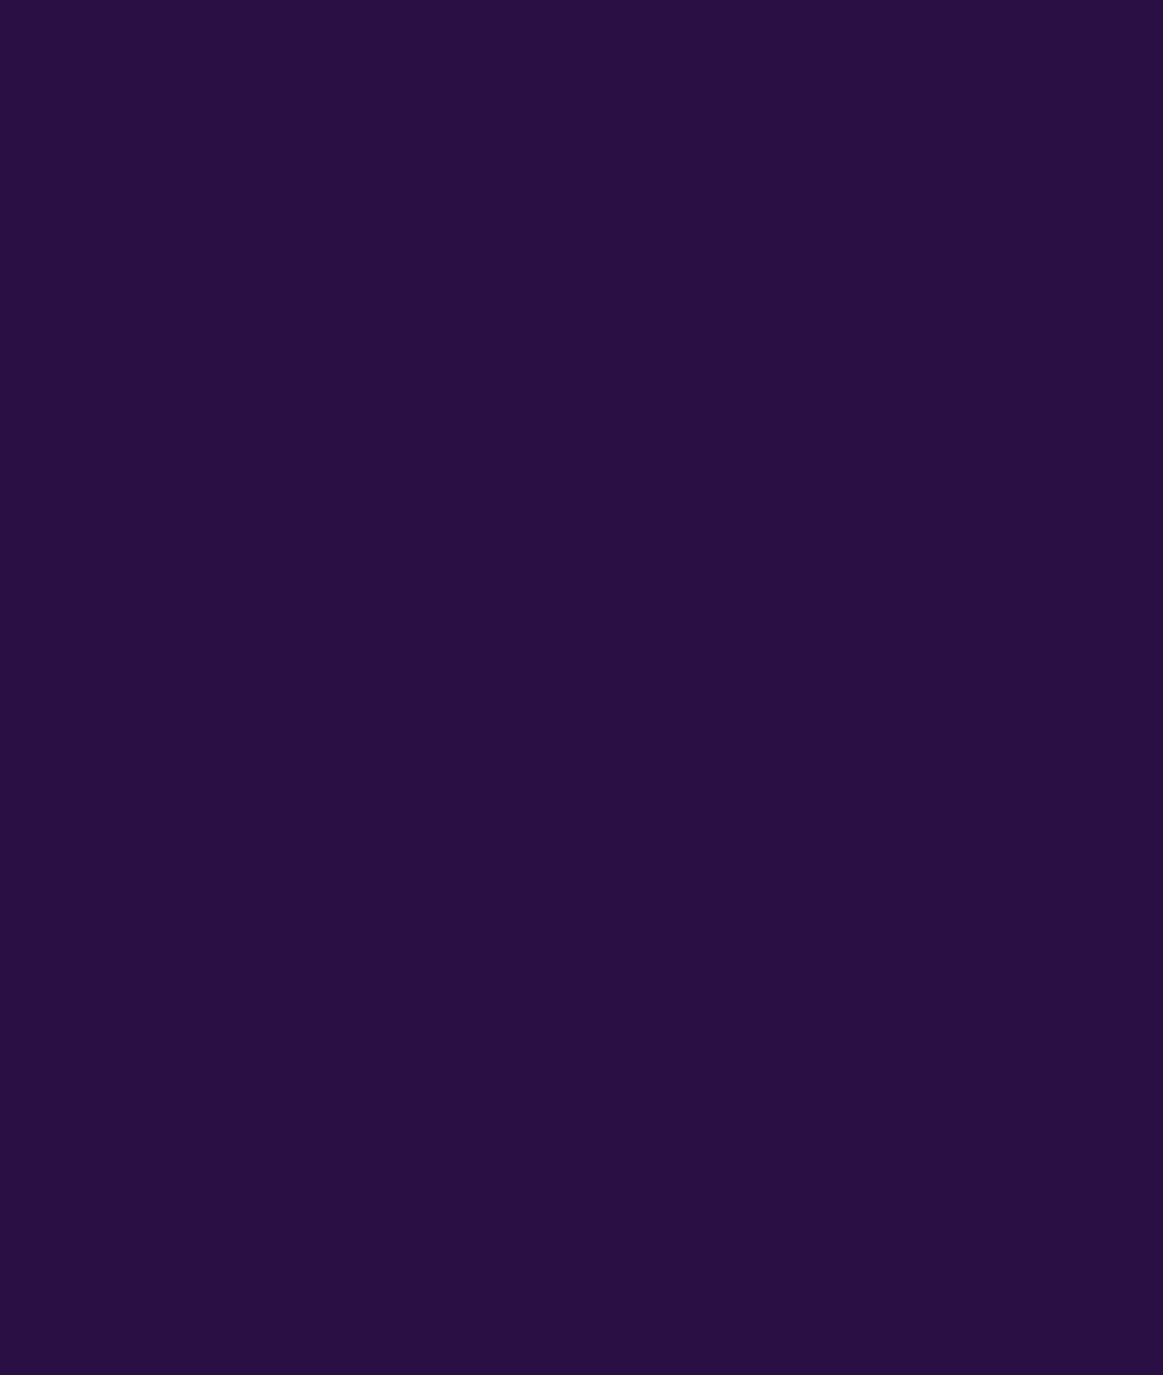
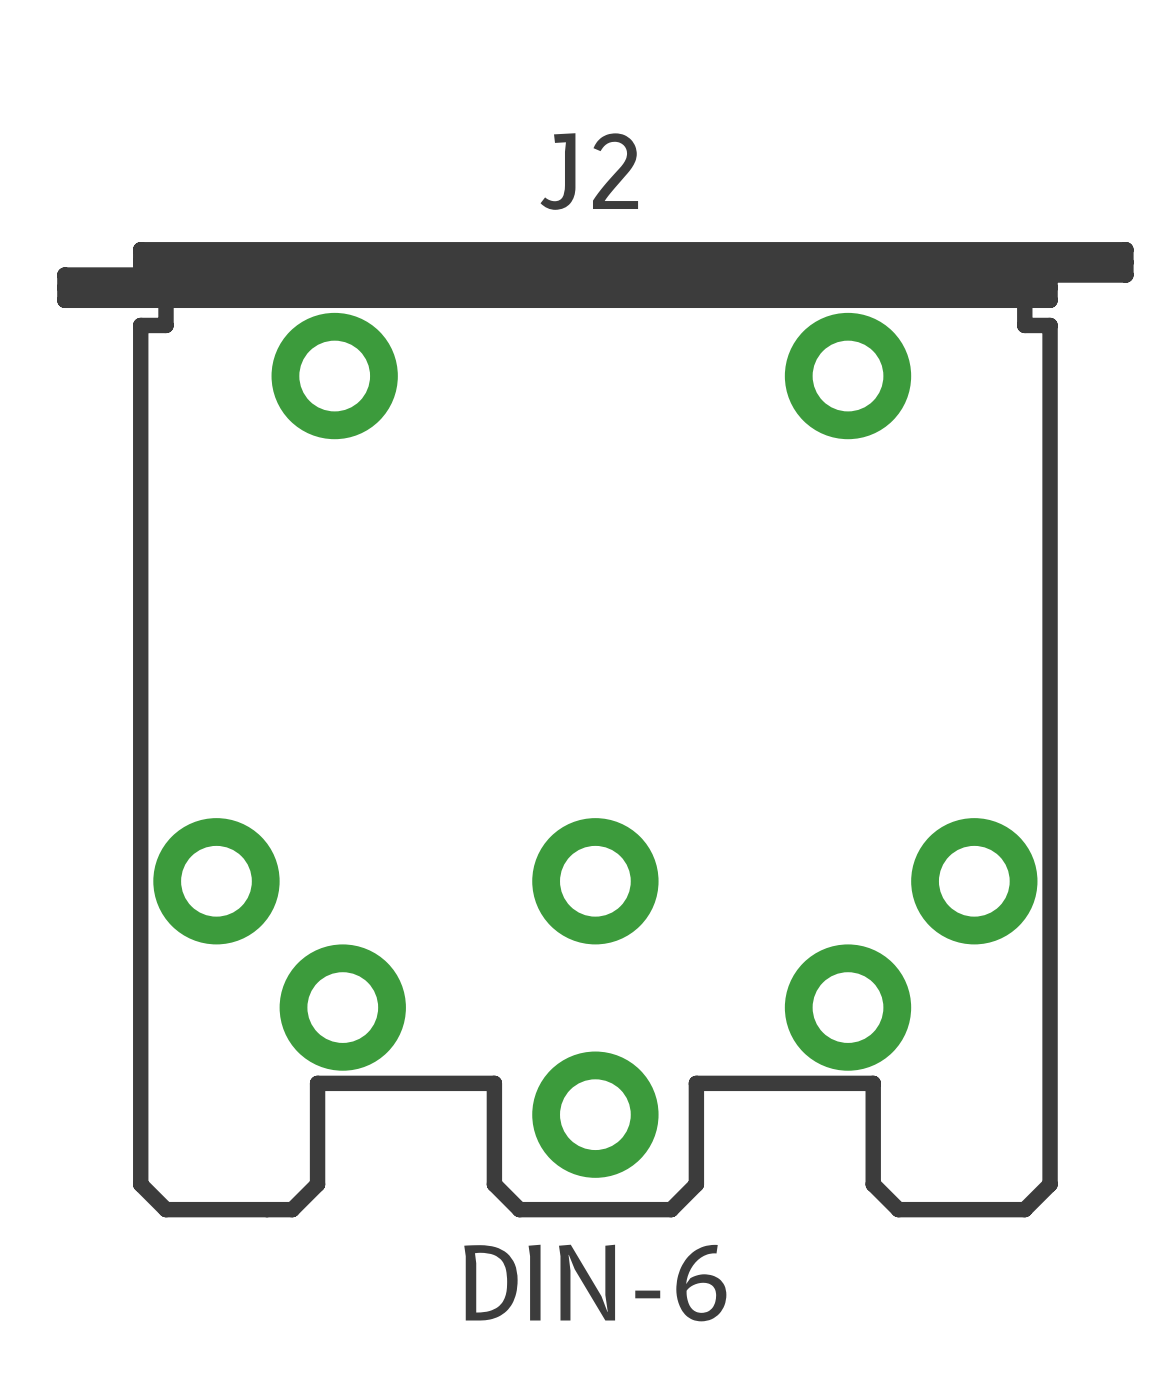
J2: none -> DIN-6 (595, 729)

